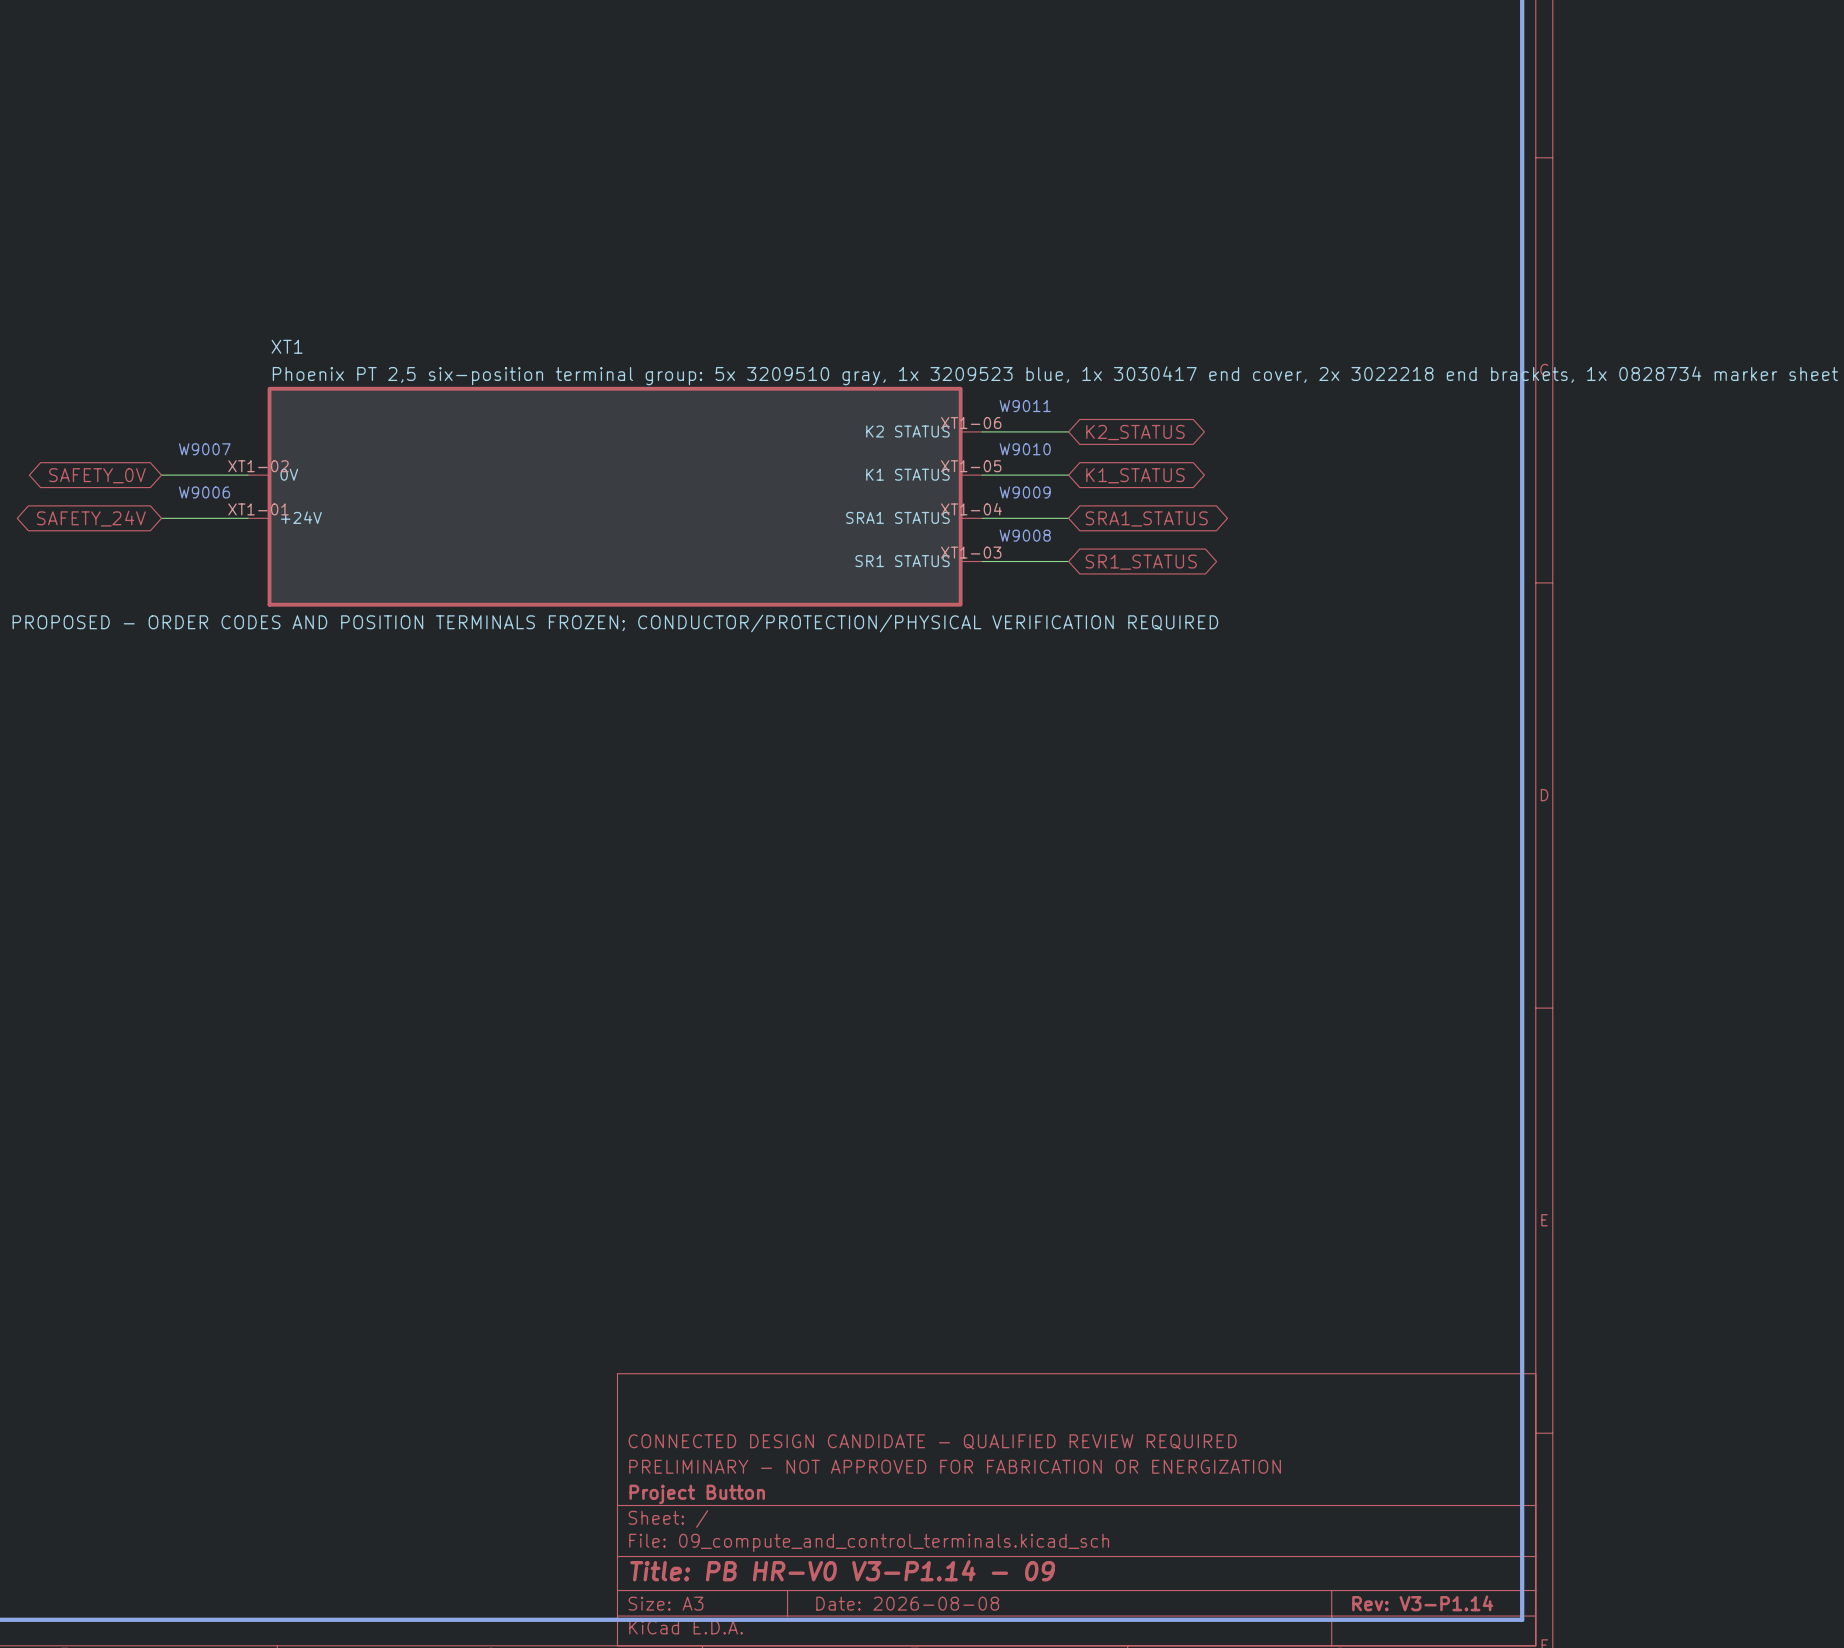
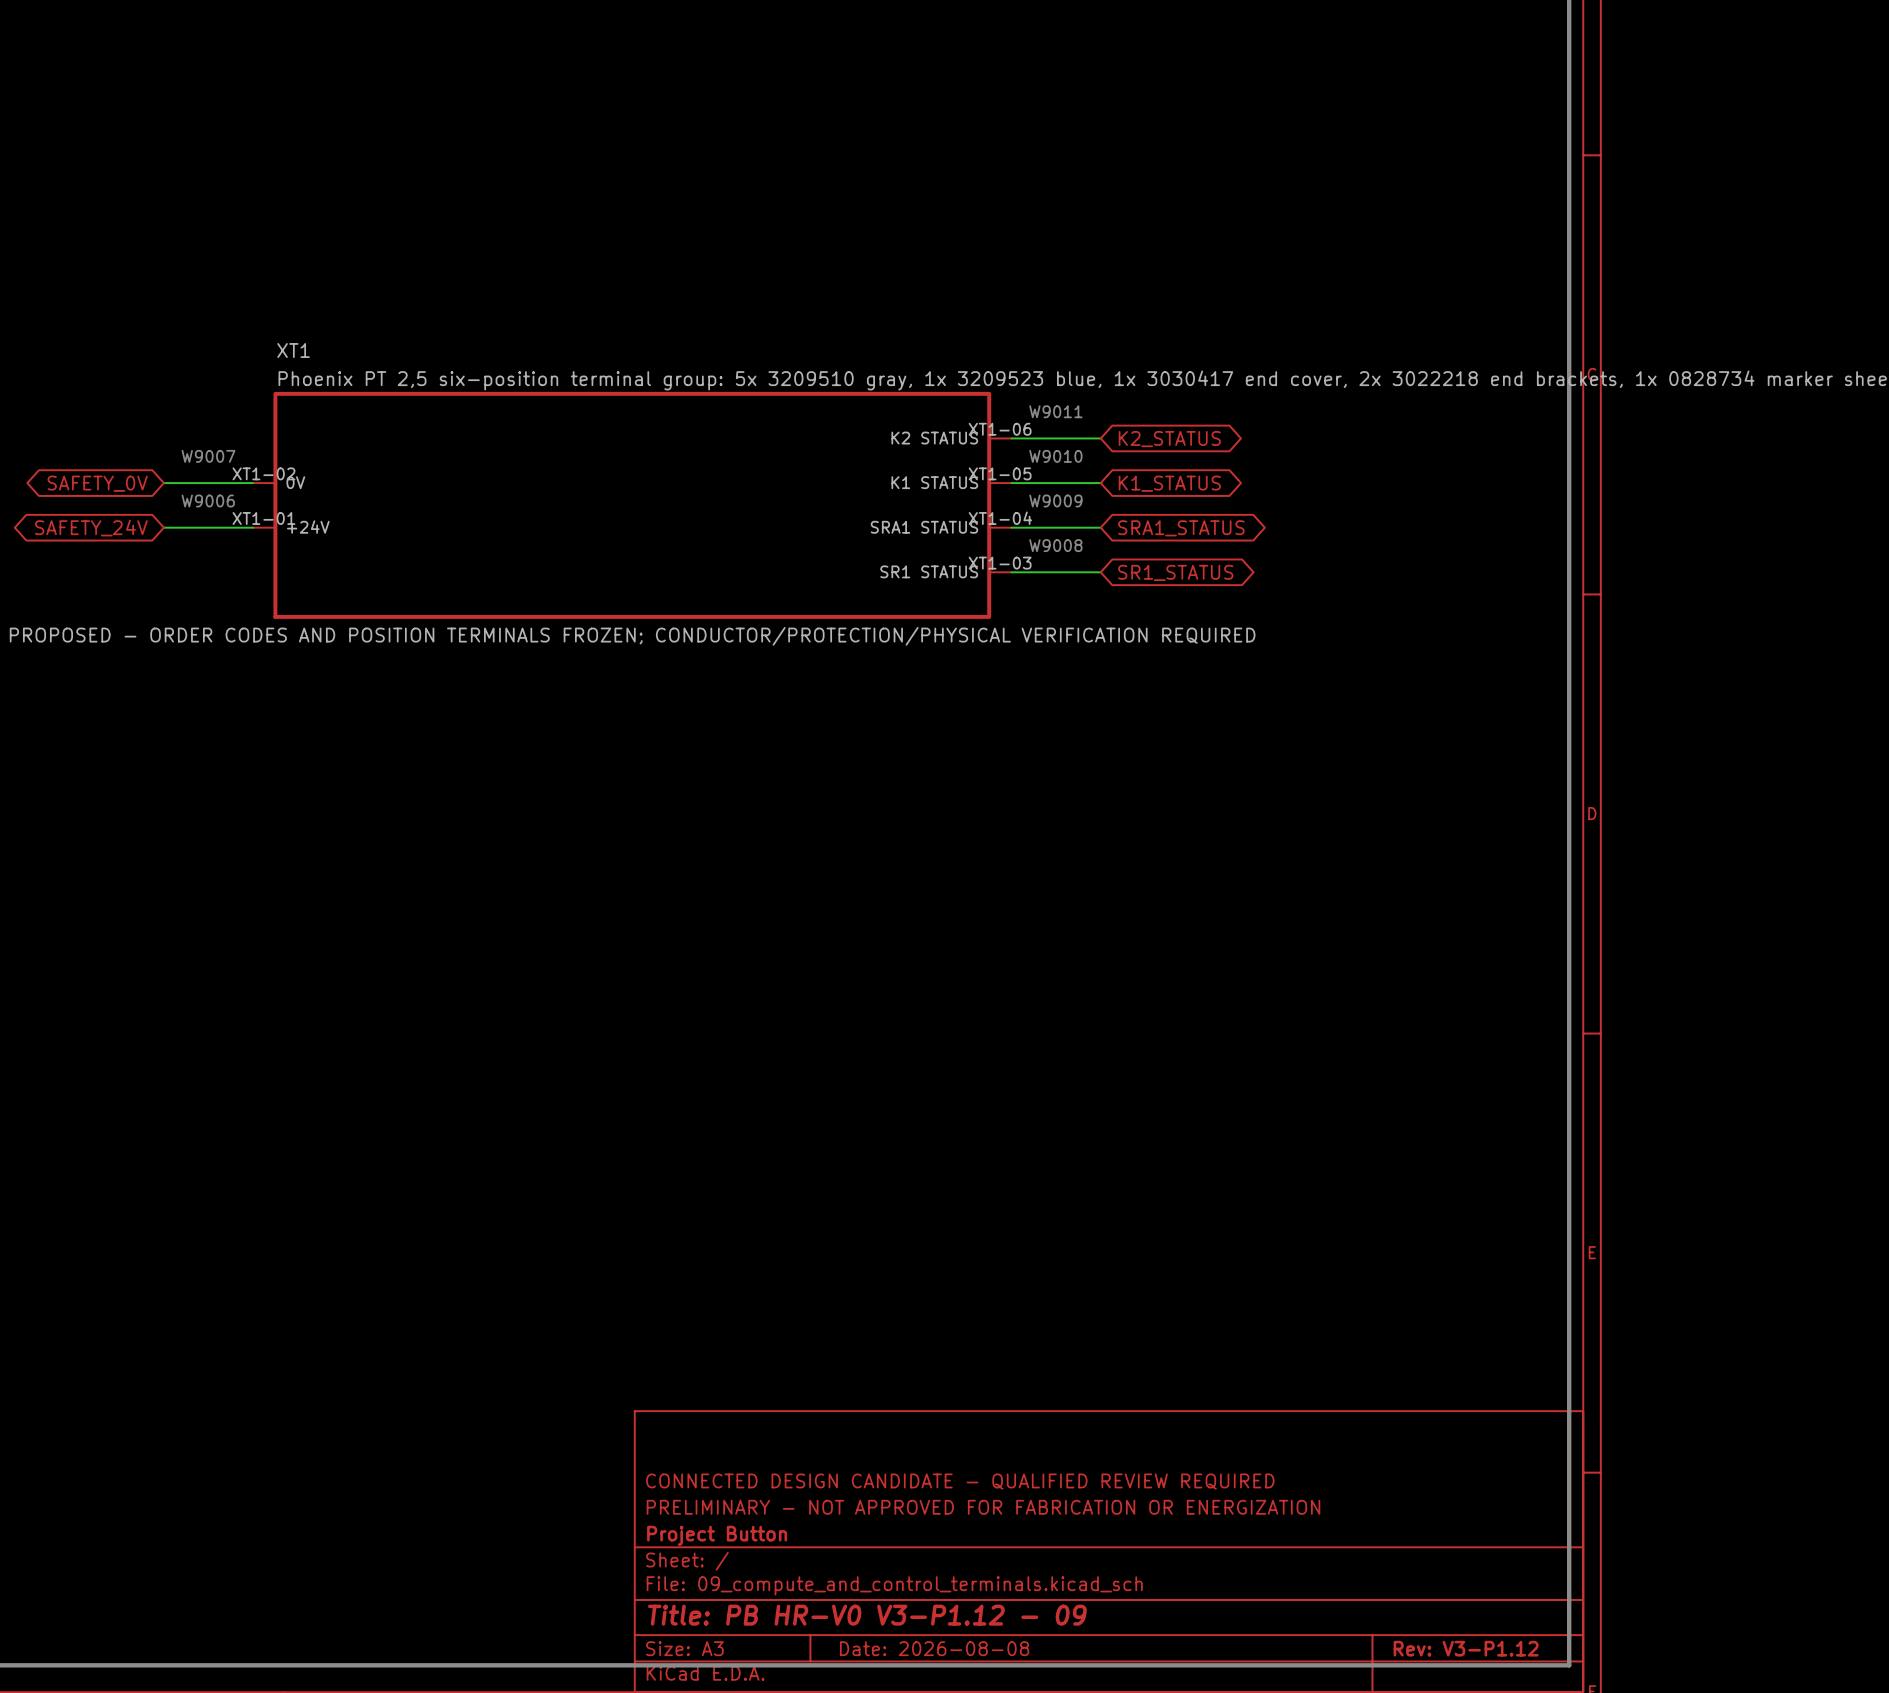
title block: Title: PB HR-V0 V3-P1.14 - 09 (842, 1570) -> Title: PB HR-V0 V3-P1.12 - 09 (867, 1615)
title block: Rev: V3-P1.14 (1422, 1603) -> Rev: V3-P1.12 (1466, 1648)

